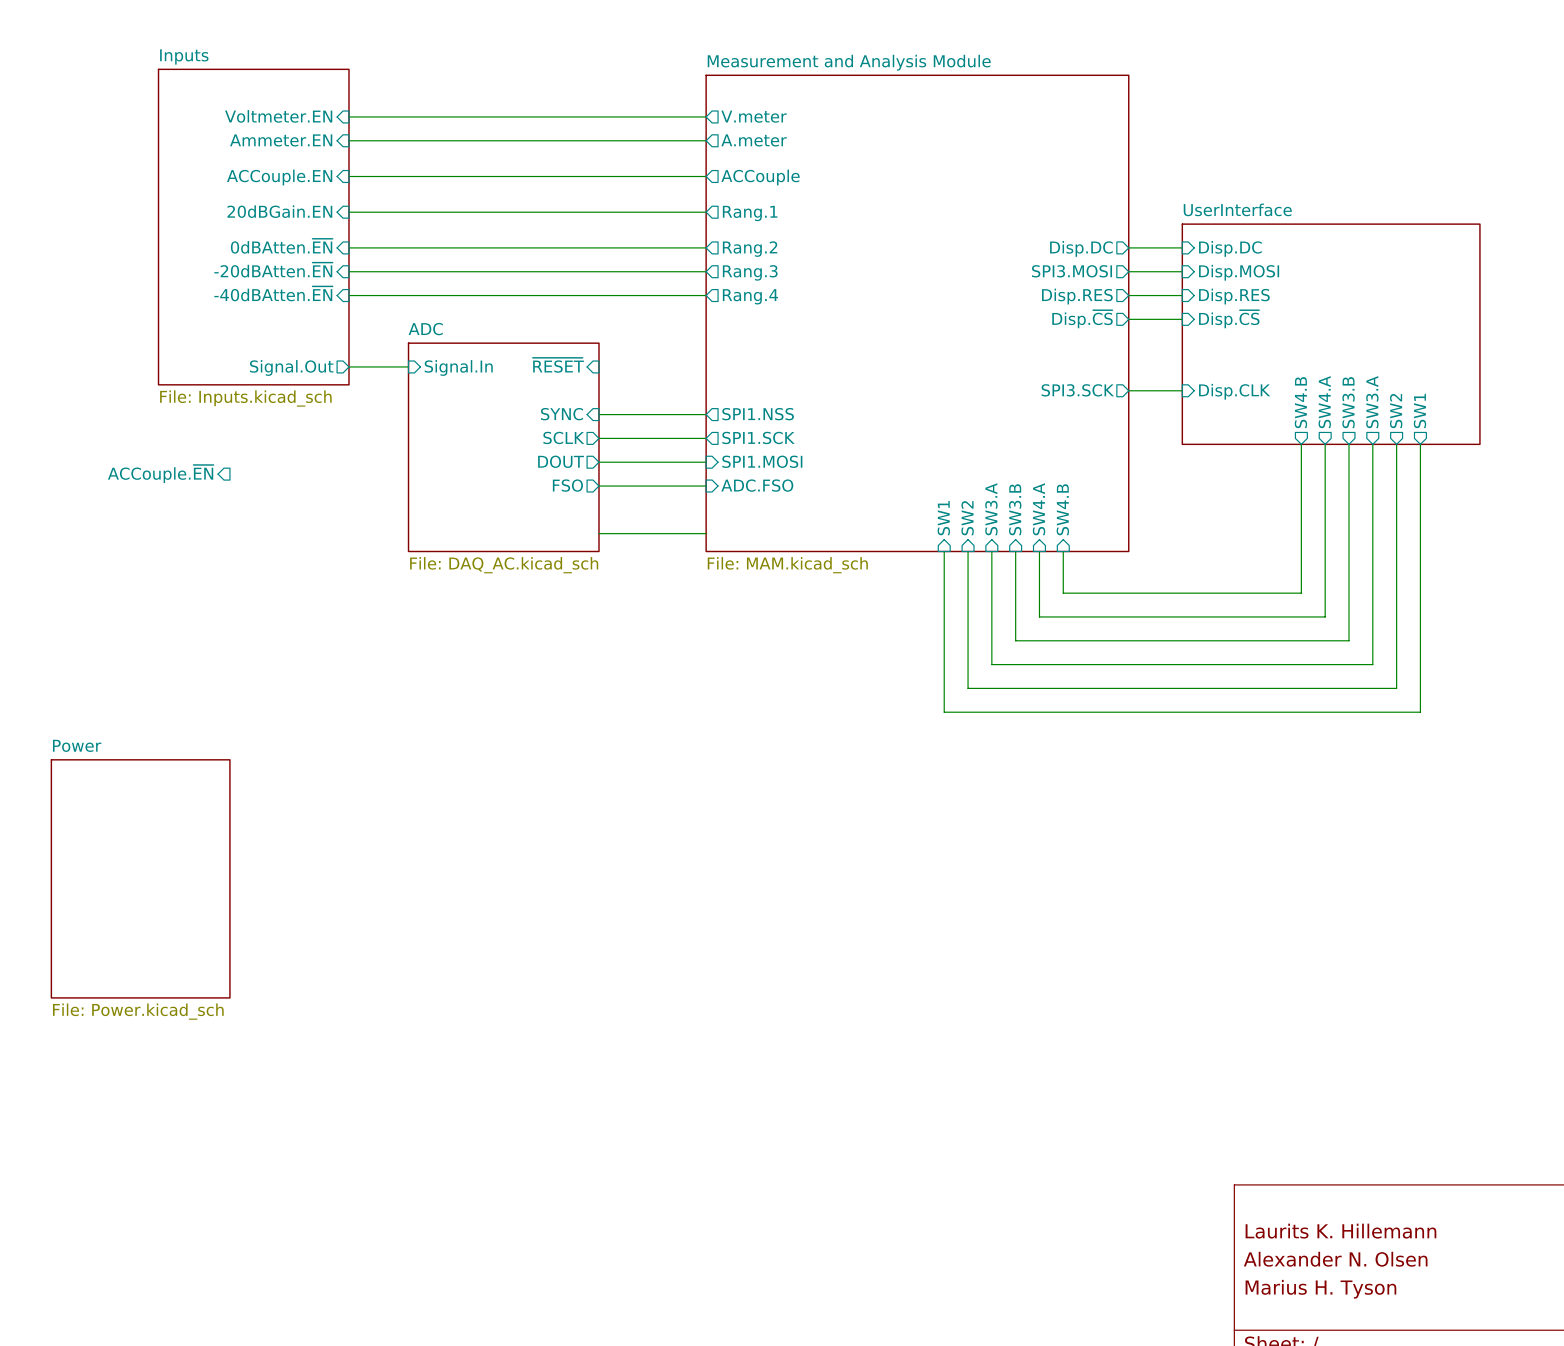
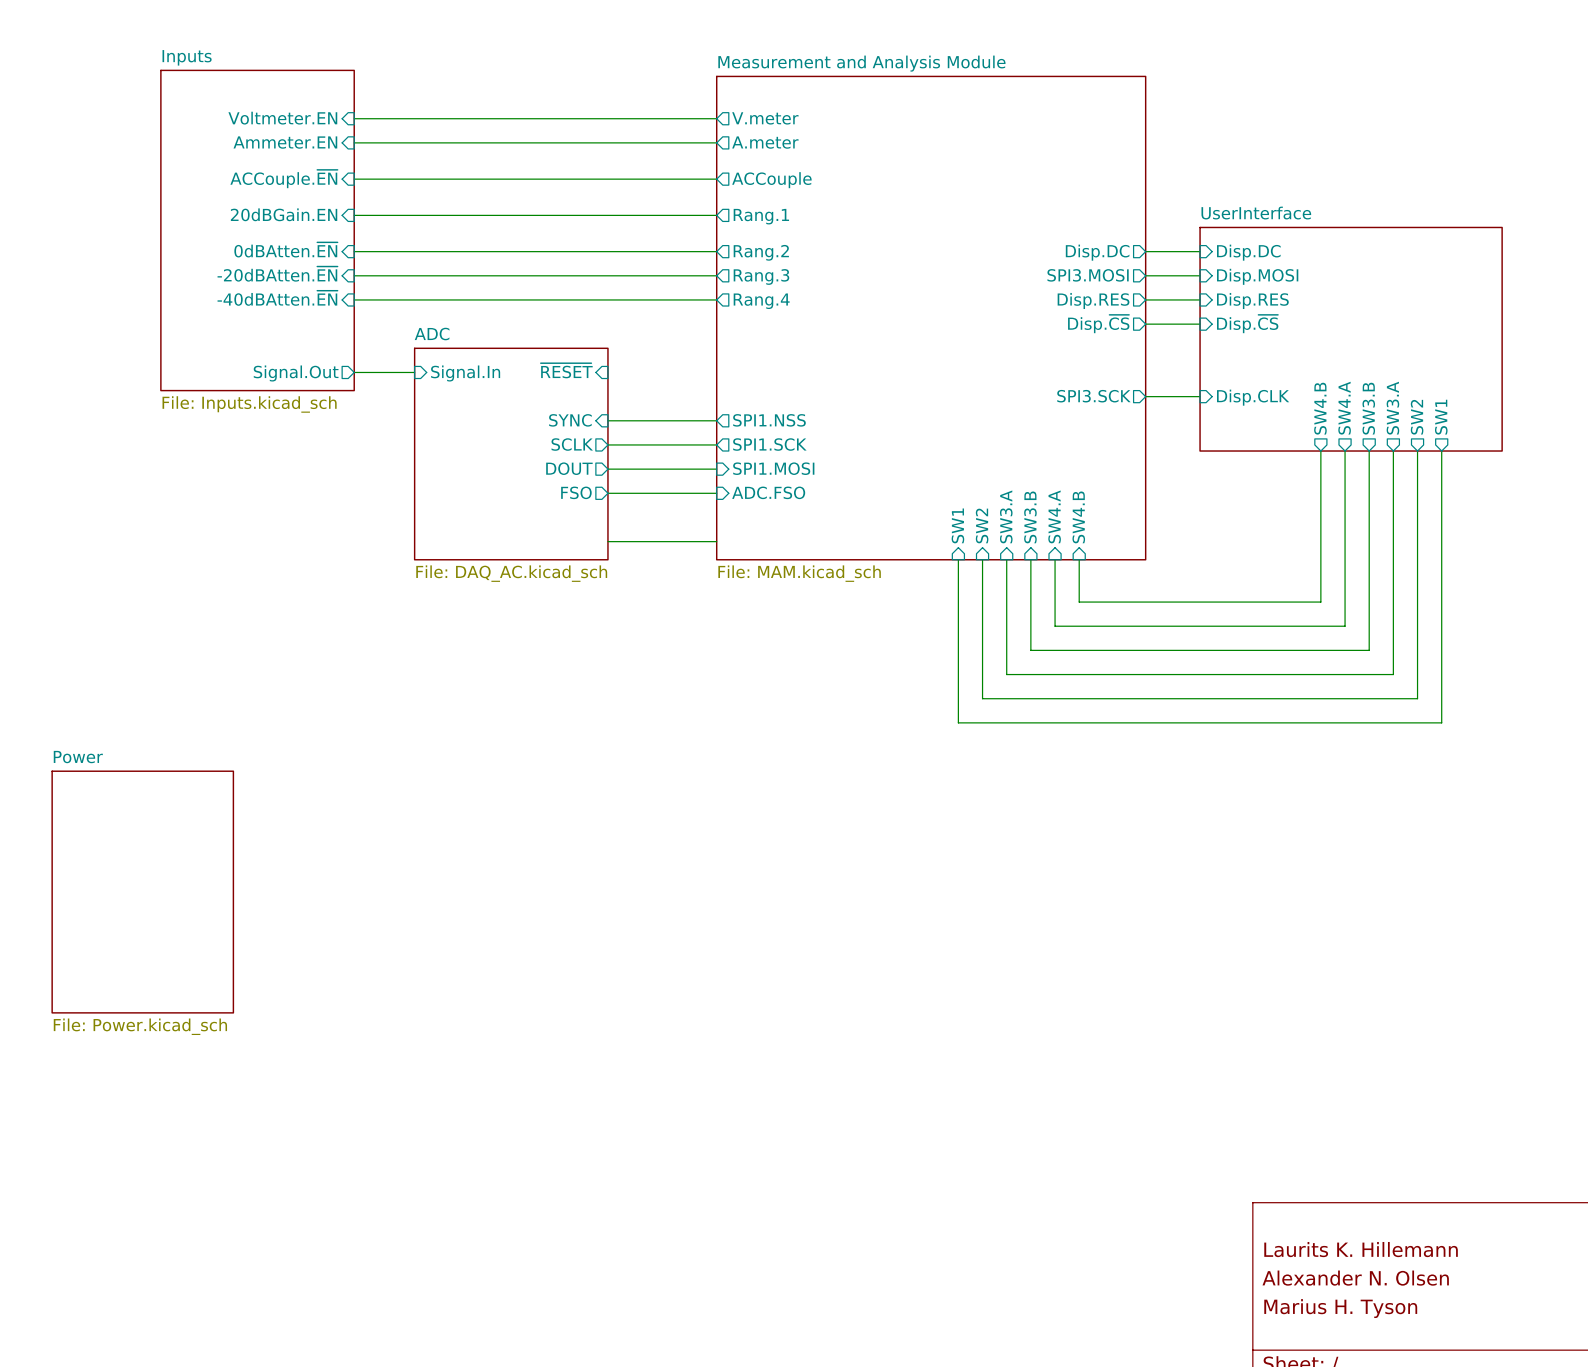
sheet pin: ACCouple.EN (279, 177) -> ACCouple.~{EN} (284, 179)
sheet pin: ACCouple.~{EN} (160, 474) -> none

